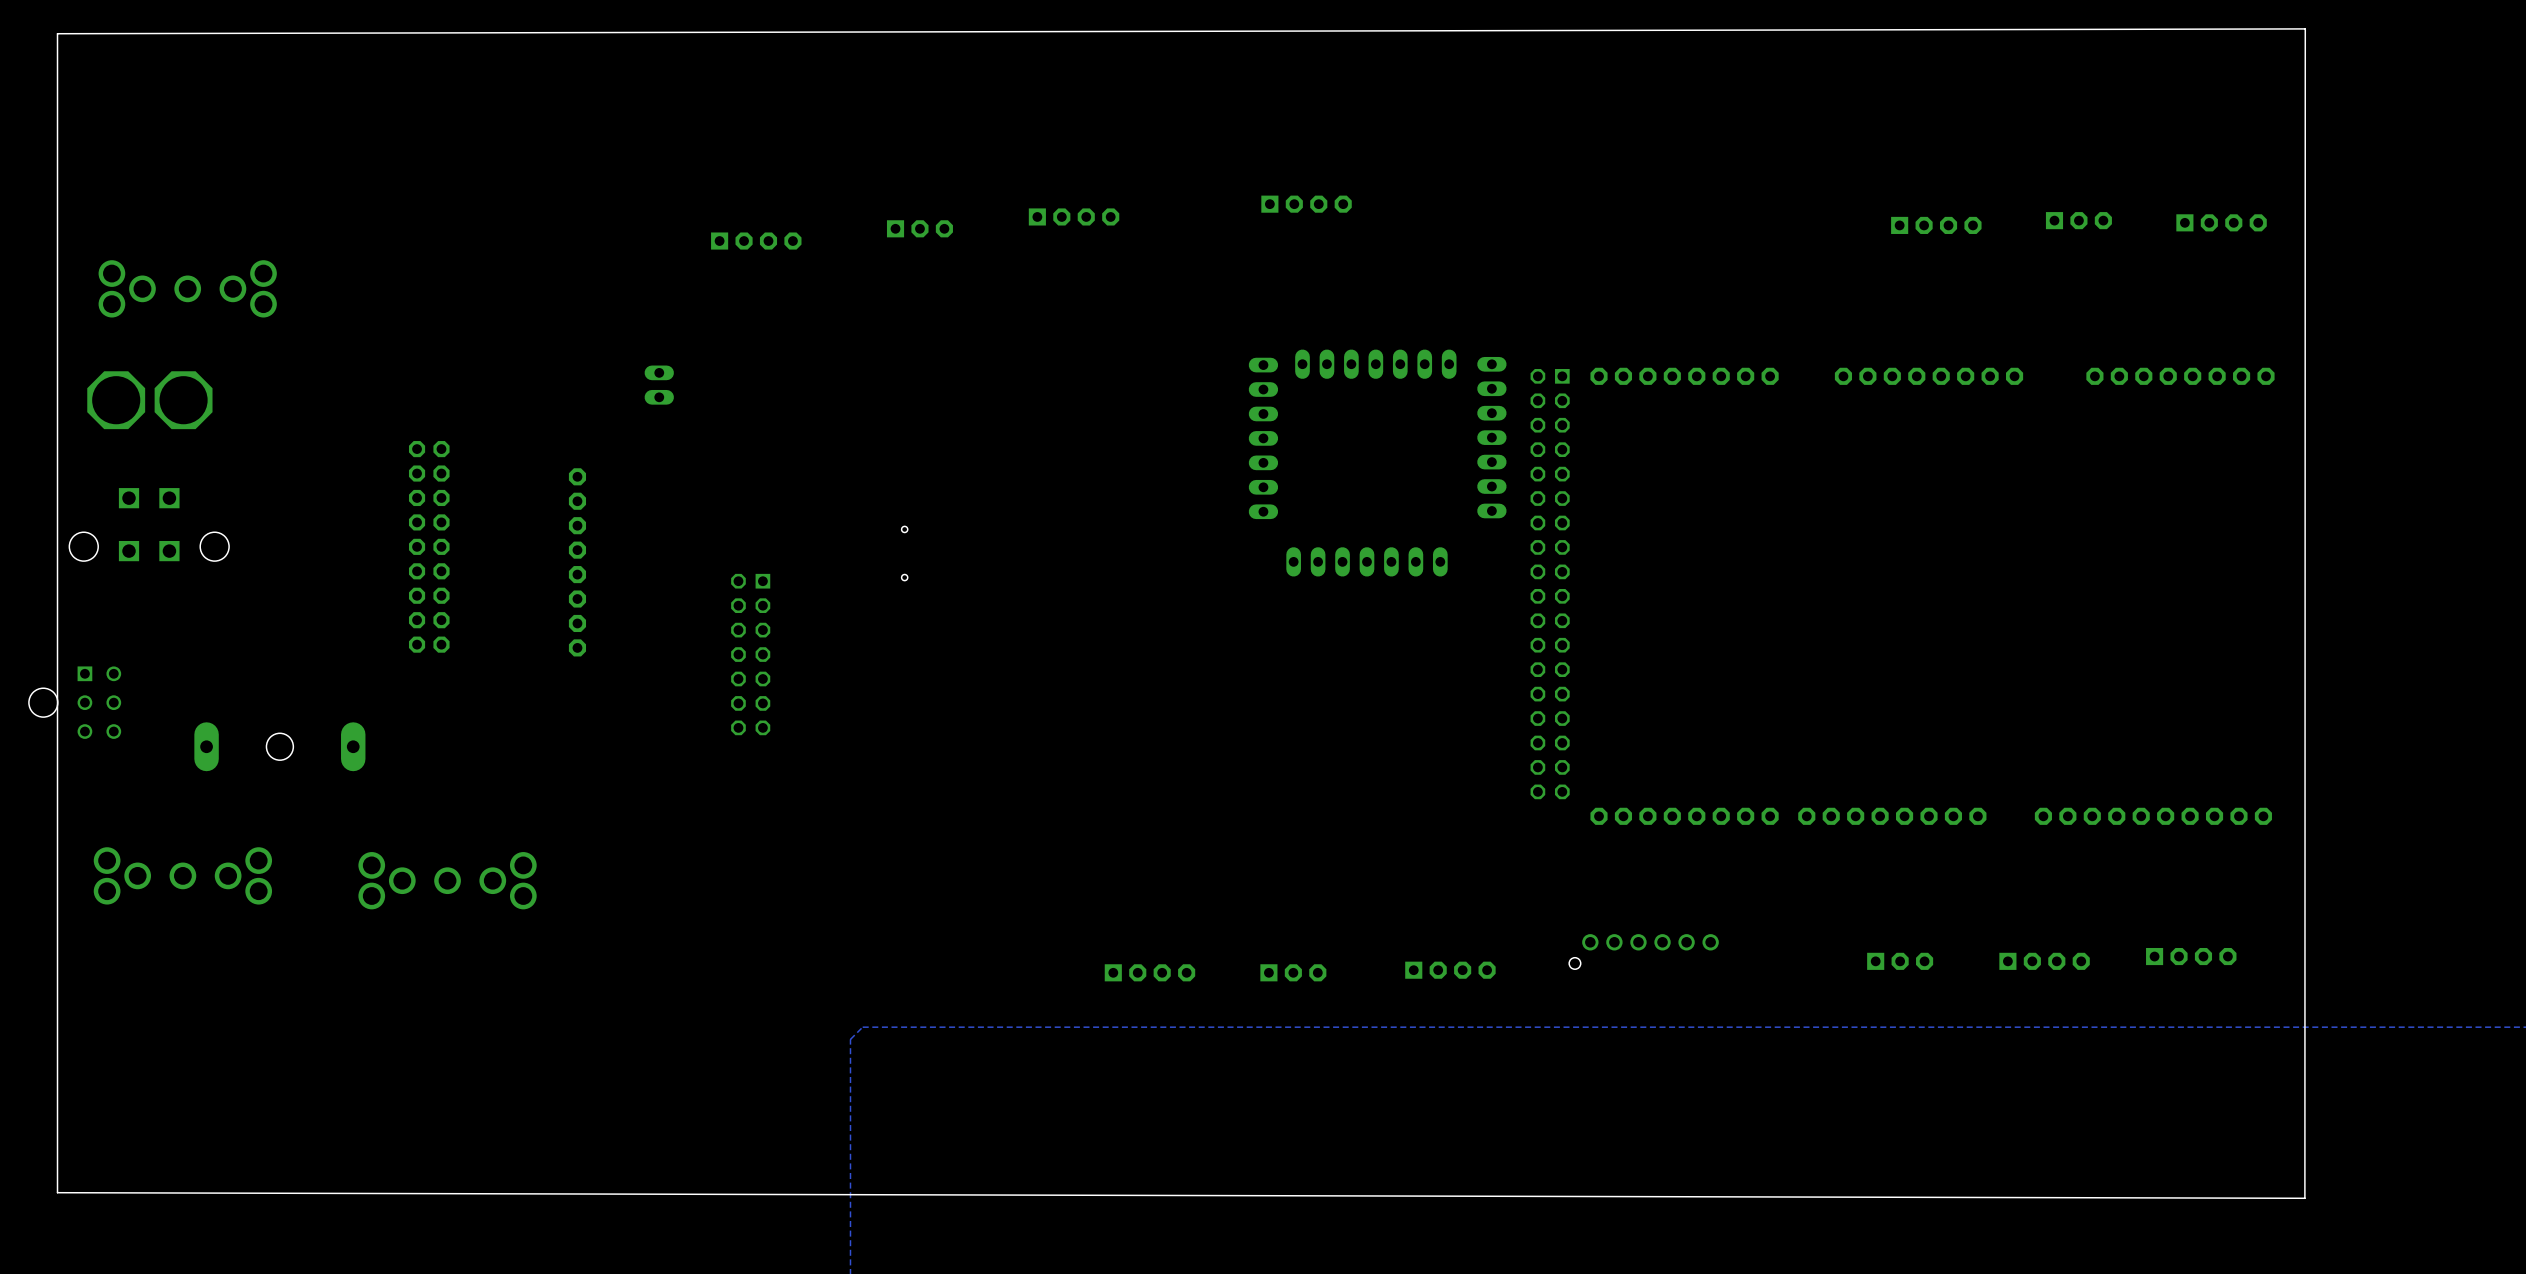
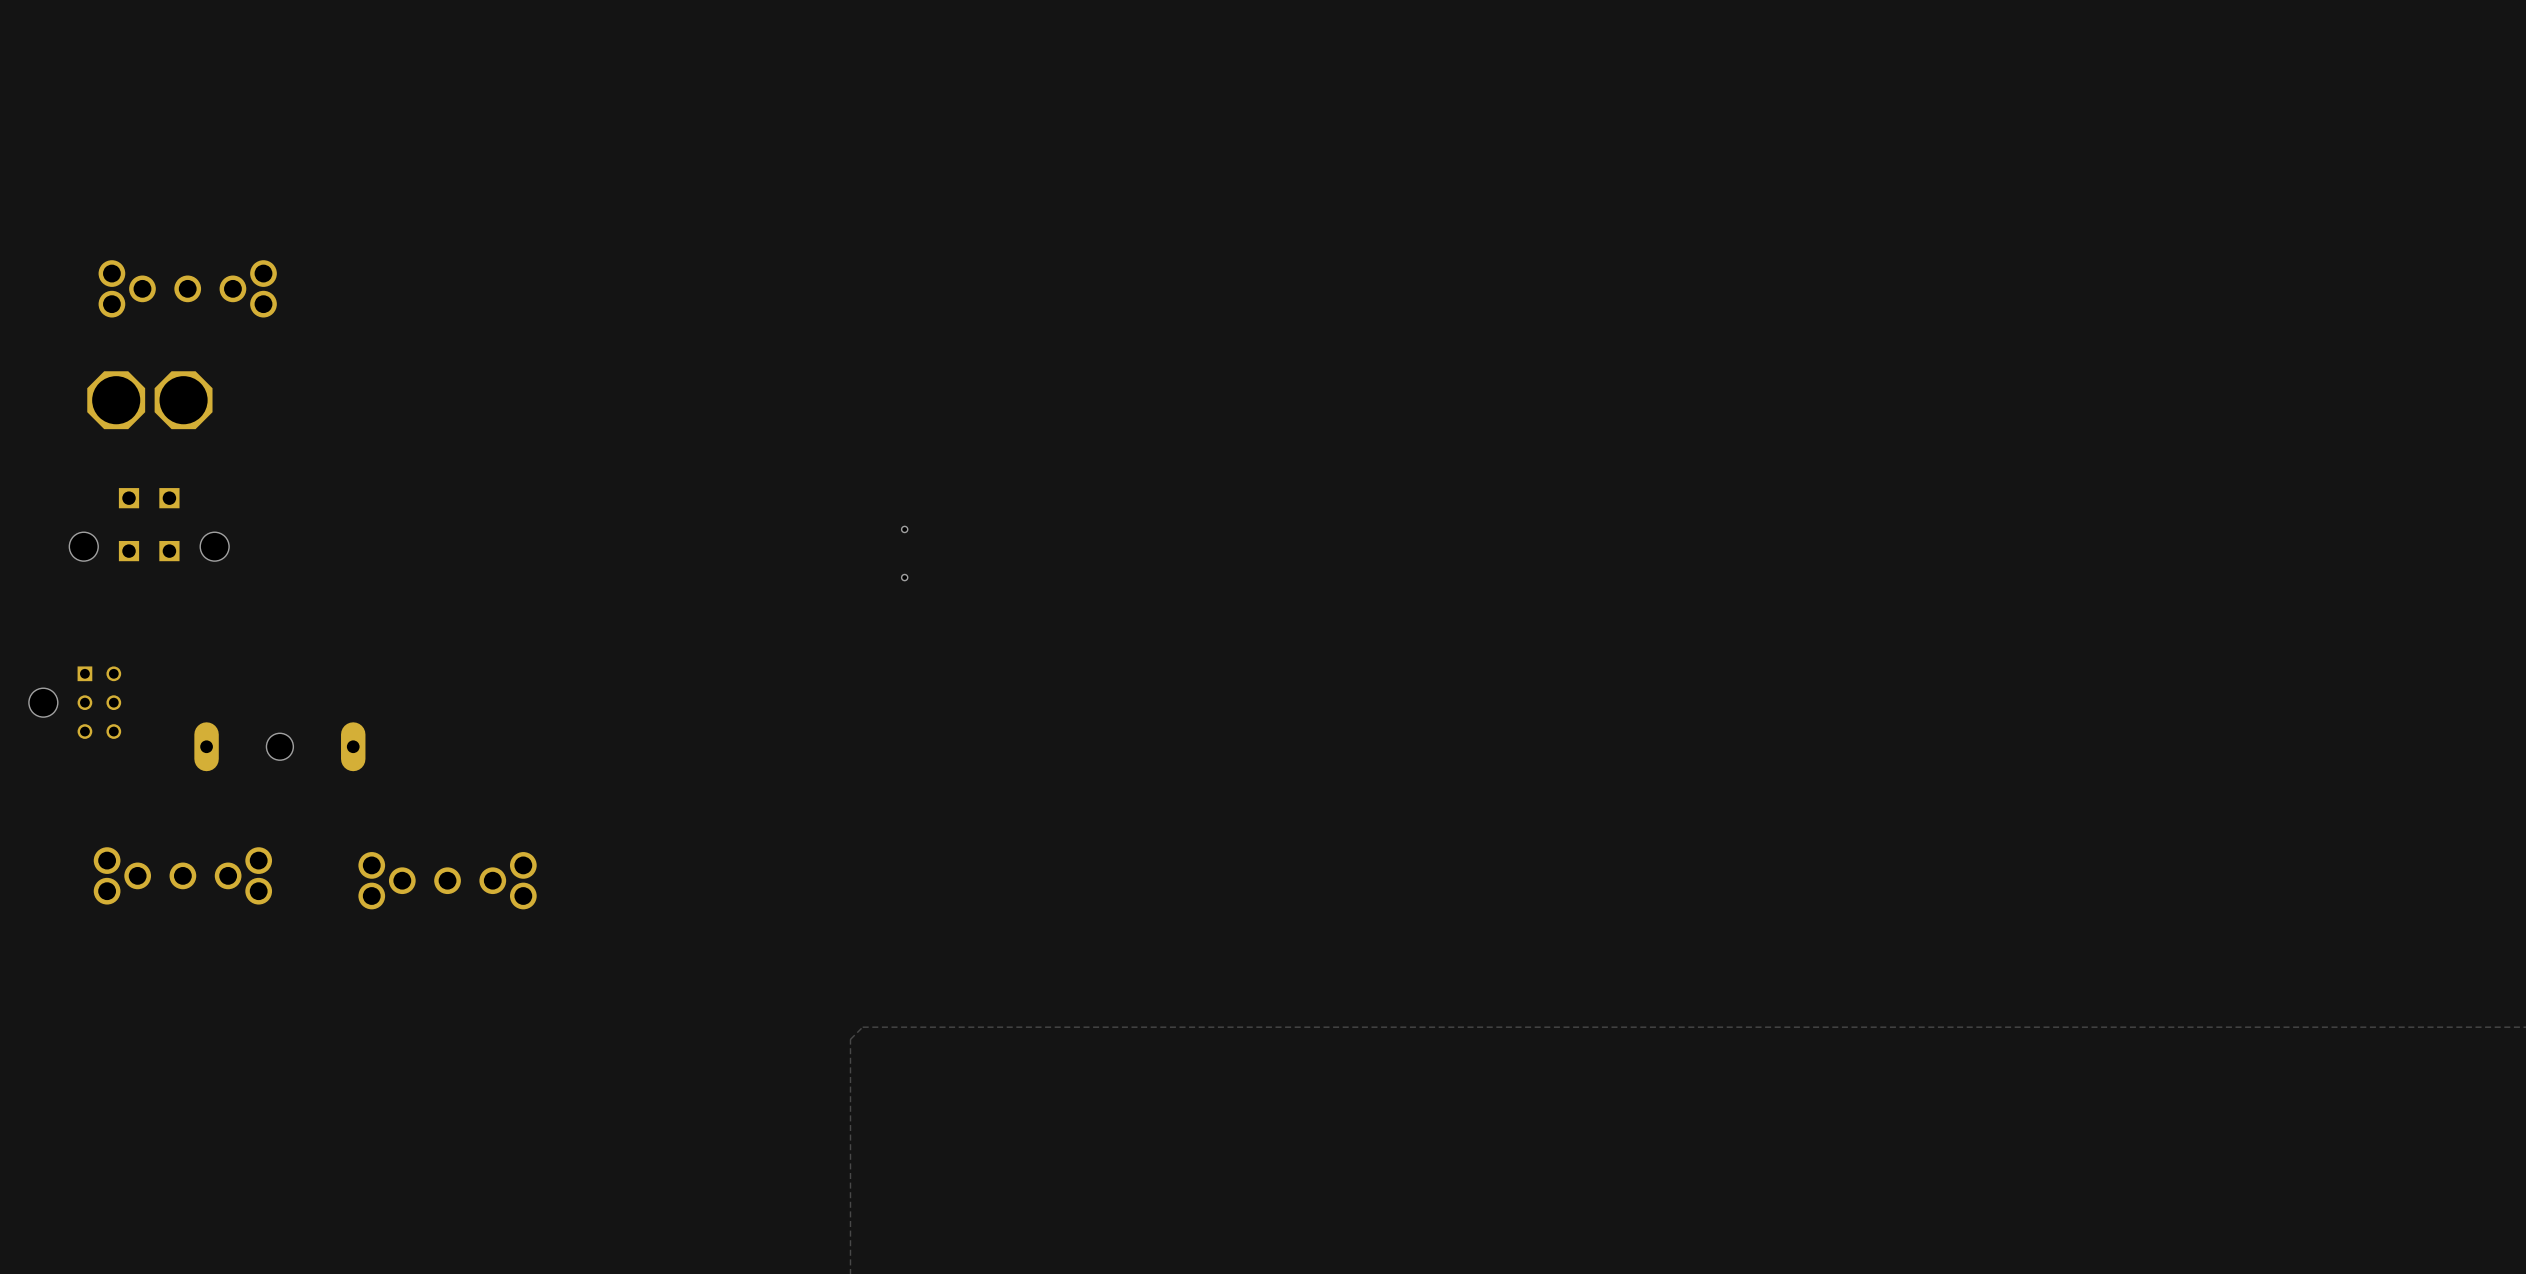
board edge: (2305, 28) (57, 33) (57, 1192) (2304, 1198) (2305, 28) -> none
part: (1306, 204) -> none
part: (1074, 216) -> none
part: (2078, 220) -> none
part: (2221, 222) -> none
part: (1936, 225) -> none
part: (919, 228) -> none
part: (756, 241) -> none
part: (1375, 364) -> none
part: (1684, 376) -> none
part: (1929, 376) -> none
part: (2180, 376) -> none
part: (659, 385) -> none
part: (1491, 437) -> none
part: (1263, 438) -> none
part: (429, 546) -> none
part: (1366, 561) -> none
part: (577, 562) -> none
part: (1550, 584) -> none
part: (750, 654) -> none
part: (1684, 816) -> none
part: (1892, 816) -> none
part: (2153, 816) -> none
part: (1644, 951) -> none
part: (2191, 956) -> none
part: (1900, 961) -> none
part: (2044, 961) -> none
part: (1450, 970) -> none
part: (1149, 972) -> none
part: (1293, 972) -> none

